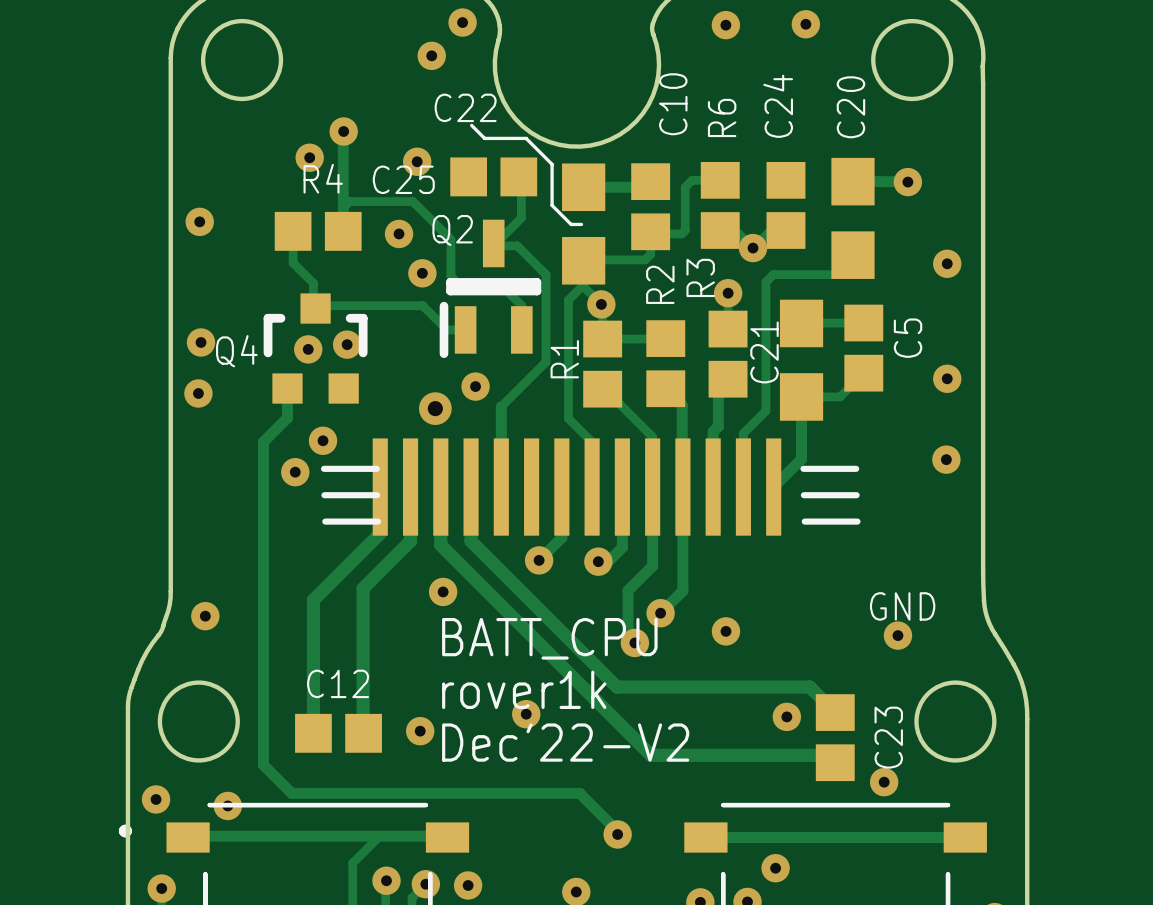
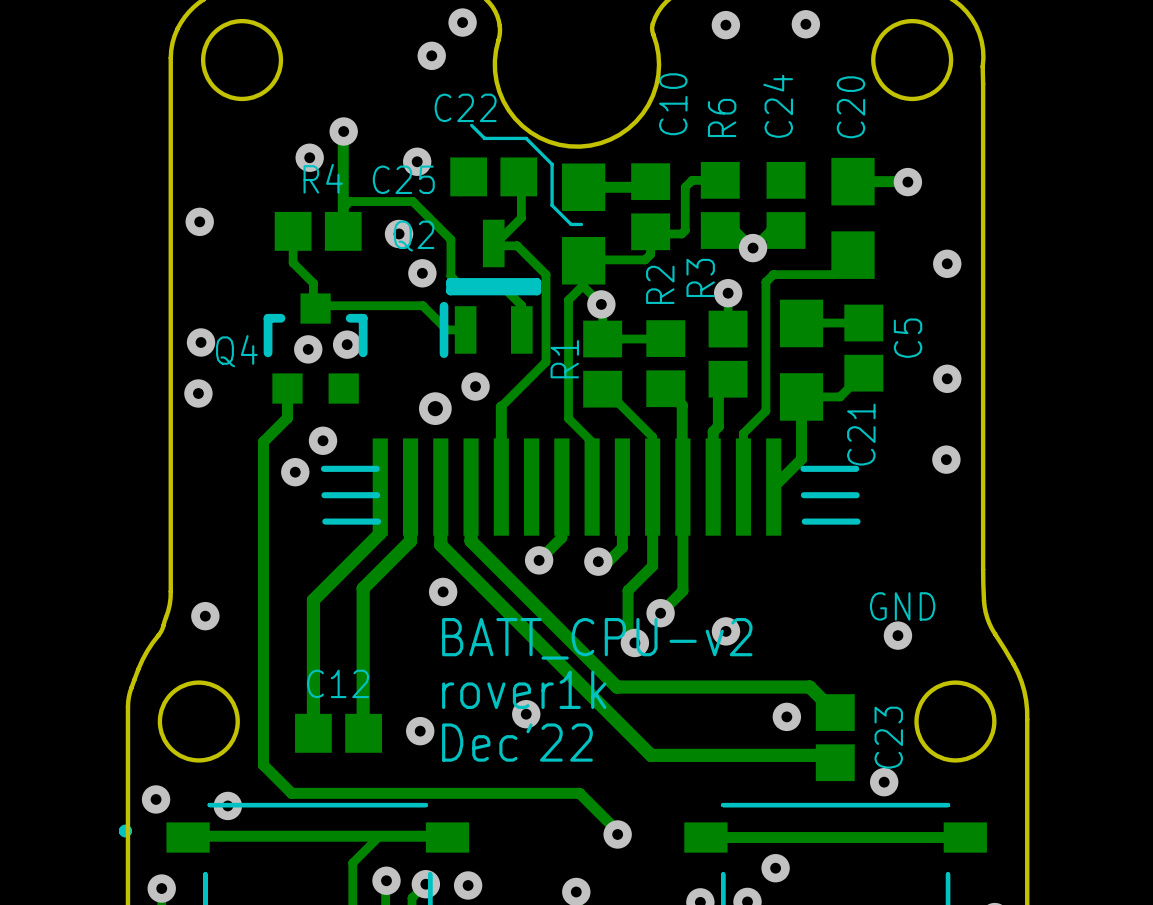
Q2 name position: Q2 (452, 230) -> Q2 (414, 236)
C21 name position: C21 (764, 352) -> C21 (861, 434)
text: BATT_CPU (549, 638) -> BATT_CPU-v2 (597, 638)
text: Dec'22-V2 (565, 742) -> Dec'22 (517, 742)

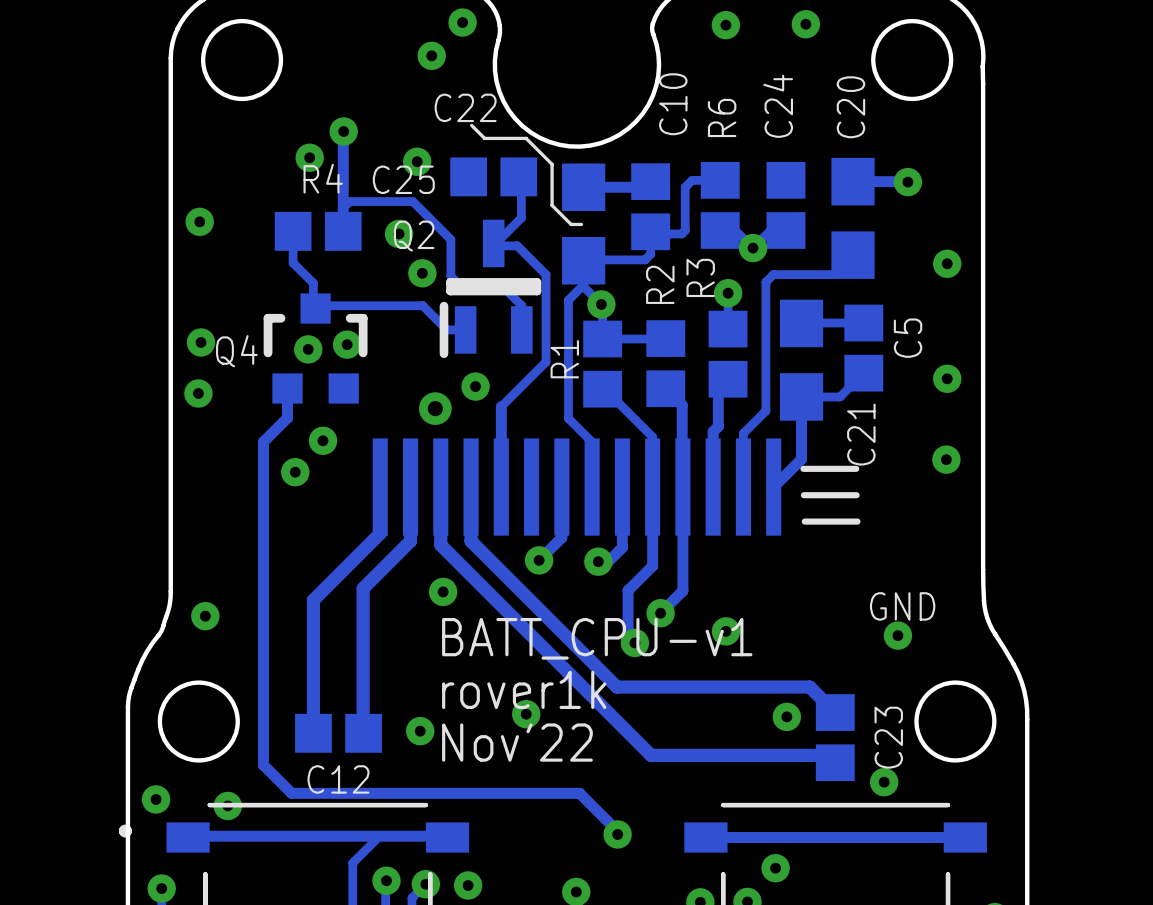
text: - (350, 468) -> none
text: - (350, 495) -> none
text: - (351, 521) -> none
text: BATT_CPU-v2 (597, 638) -> BATT_CPU-v1 (597, 638)
C12 name position: C12 (338, 683) -> C12 (338, 779)
text: Dec'22 (517, 742) -> Nov'22 (517, 742)

